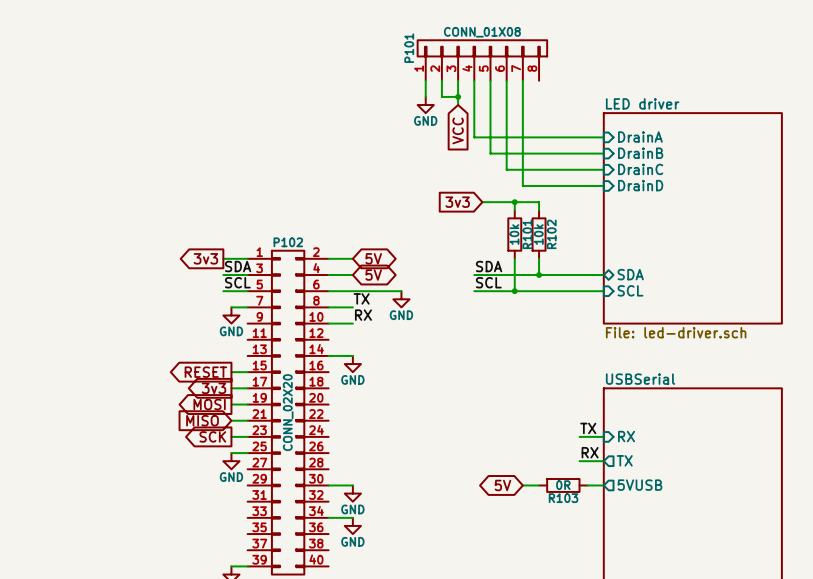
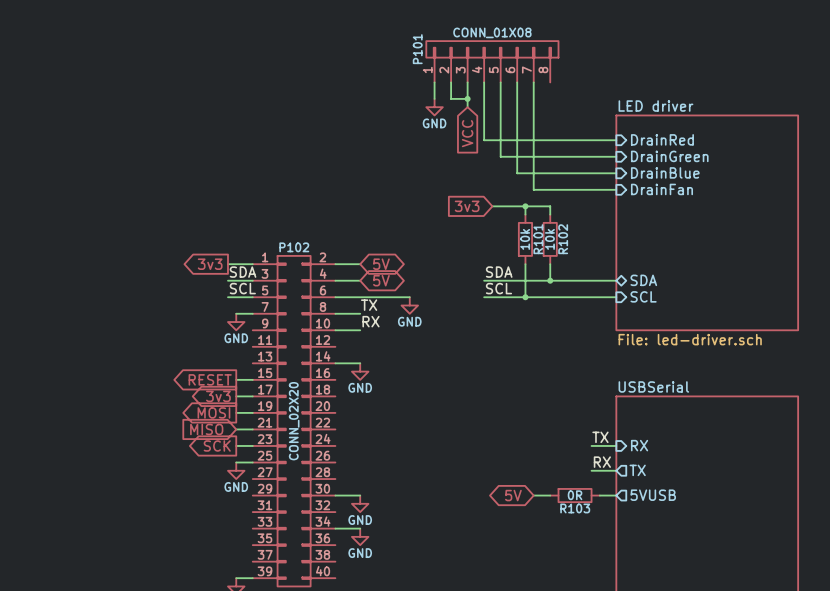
sheet pin: DrainA (640, 137) -> DrainRed (662, 139)
sheet pin: DrainB (640, 153) -> DrainGreen (669, 156)
sheet pin: DrainC (640, 169) -> DrainBlue (665, 172)
sheet pin: DrainD (640, 185) -> DrainFan (661, 189)

